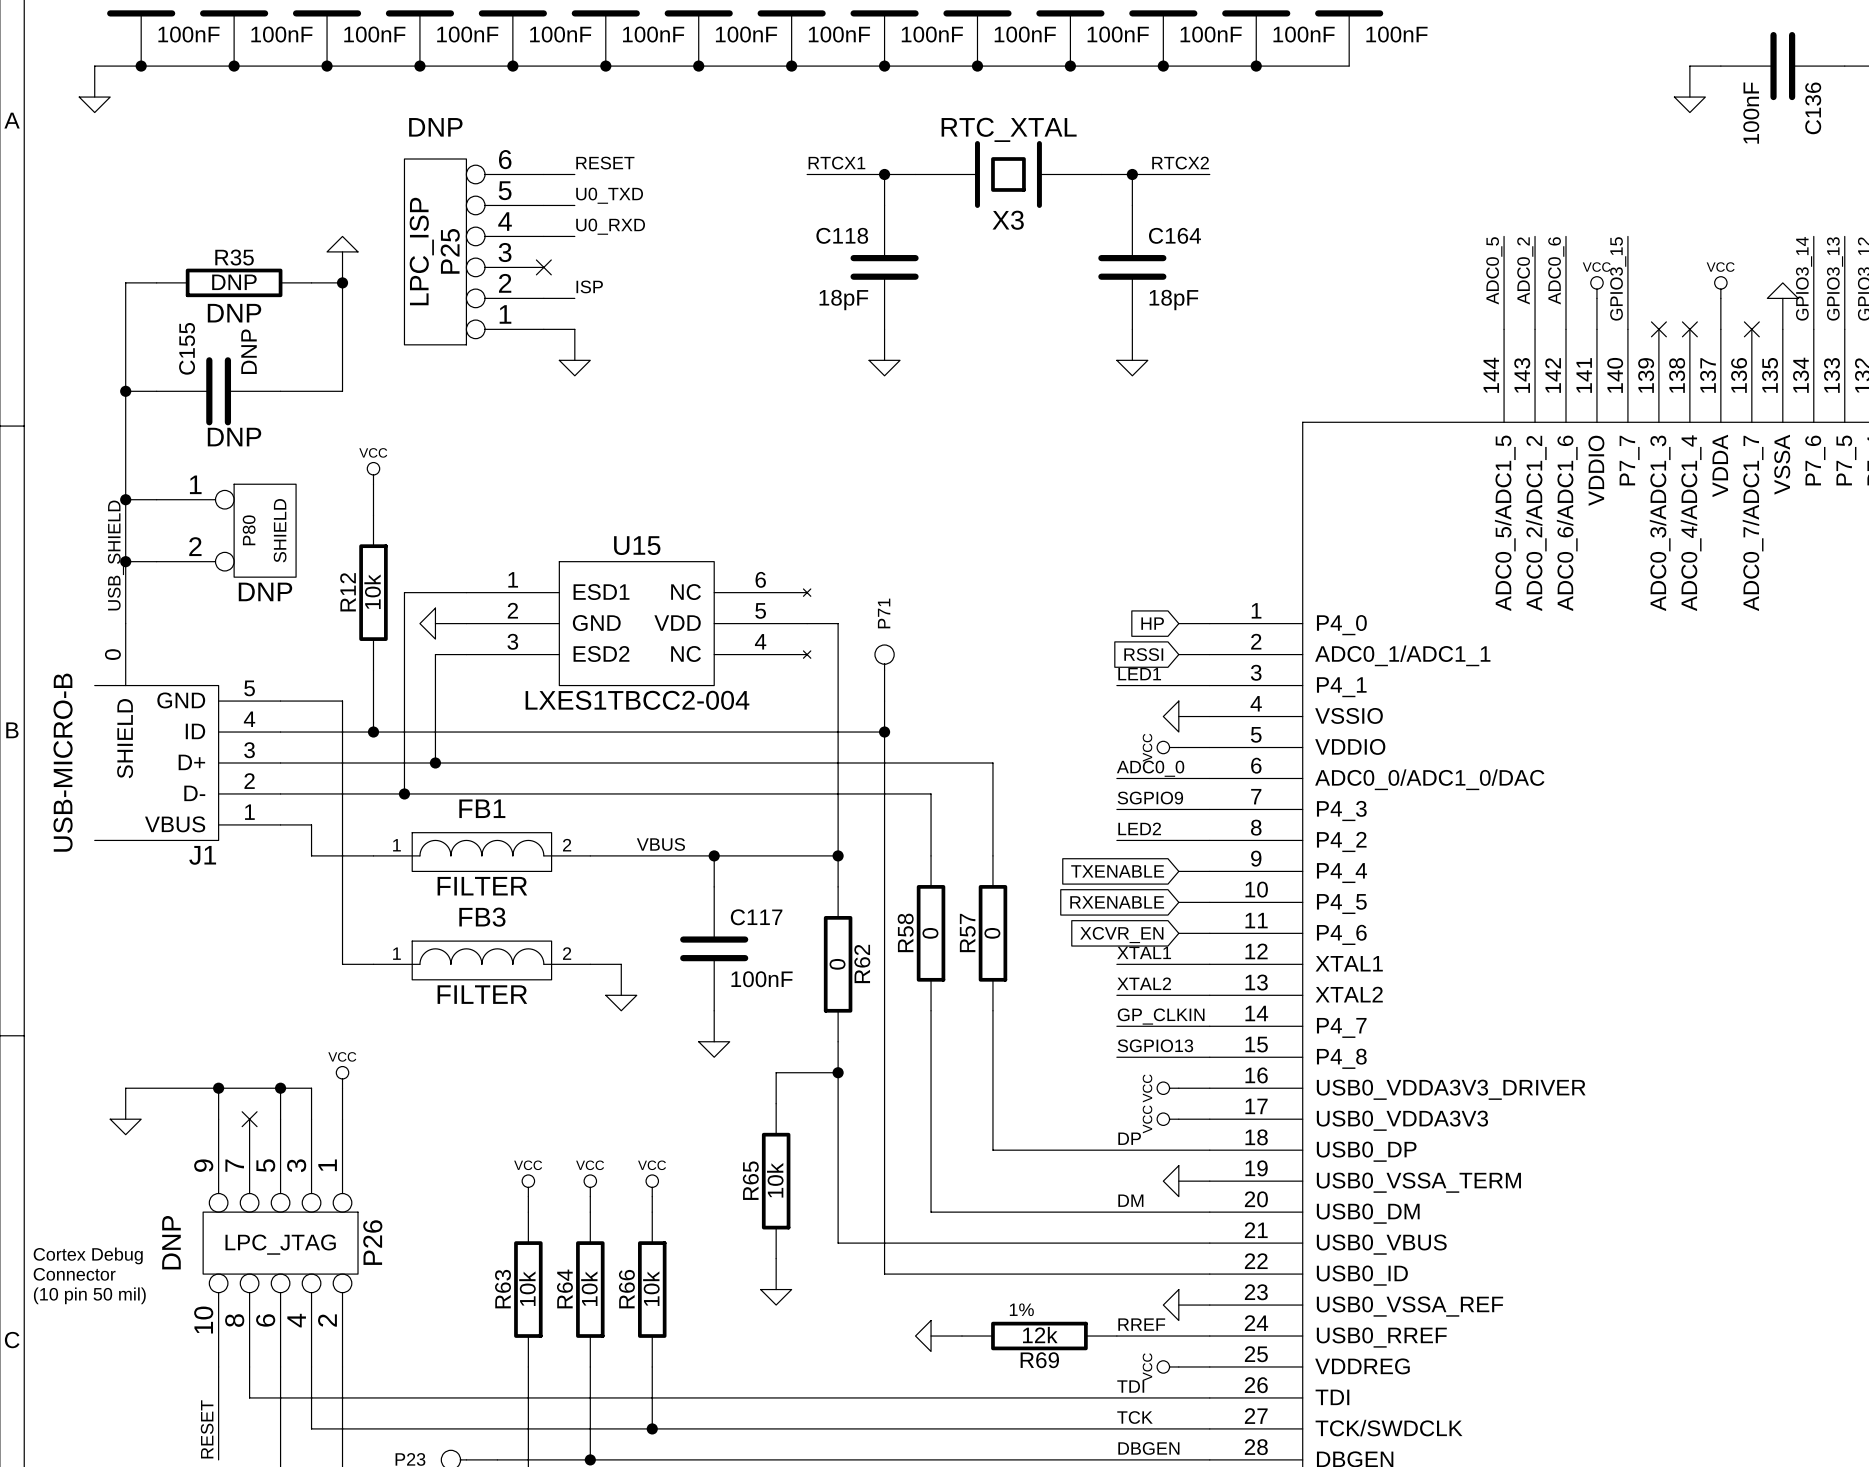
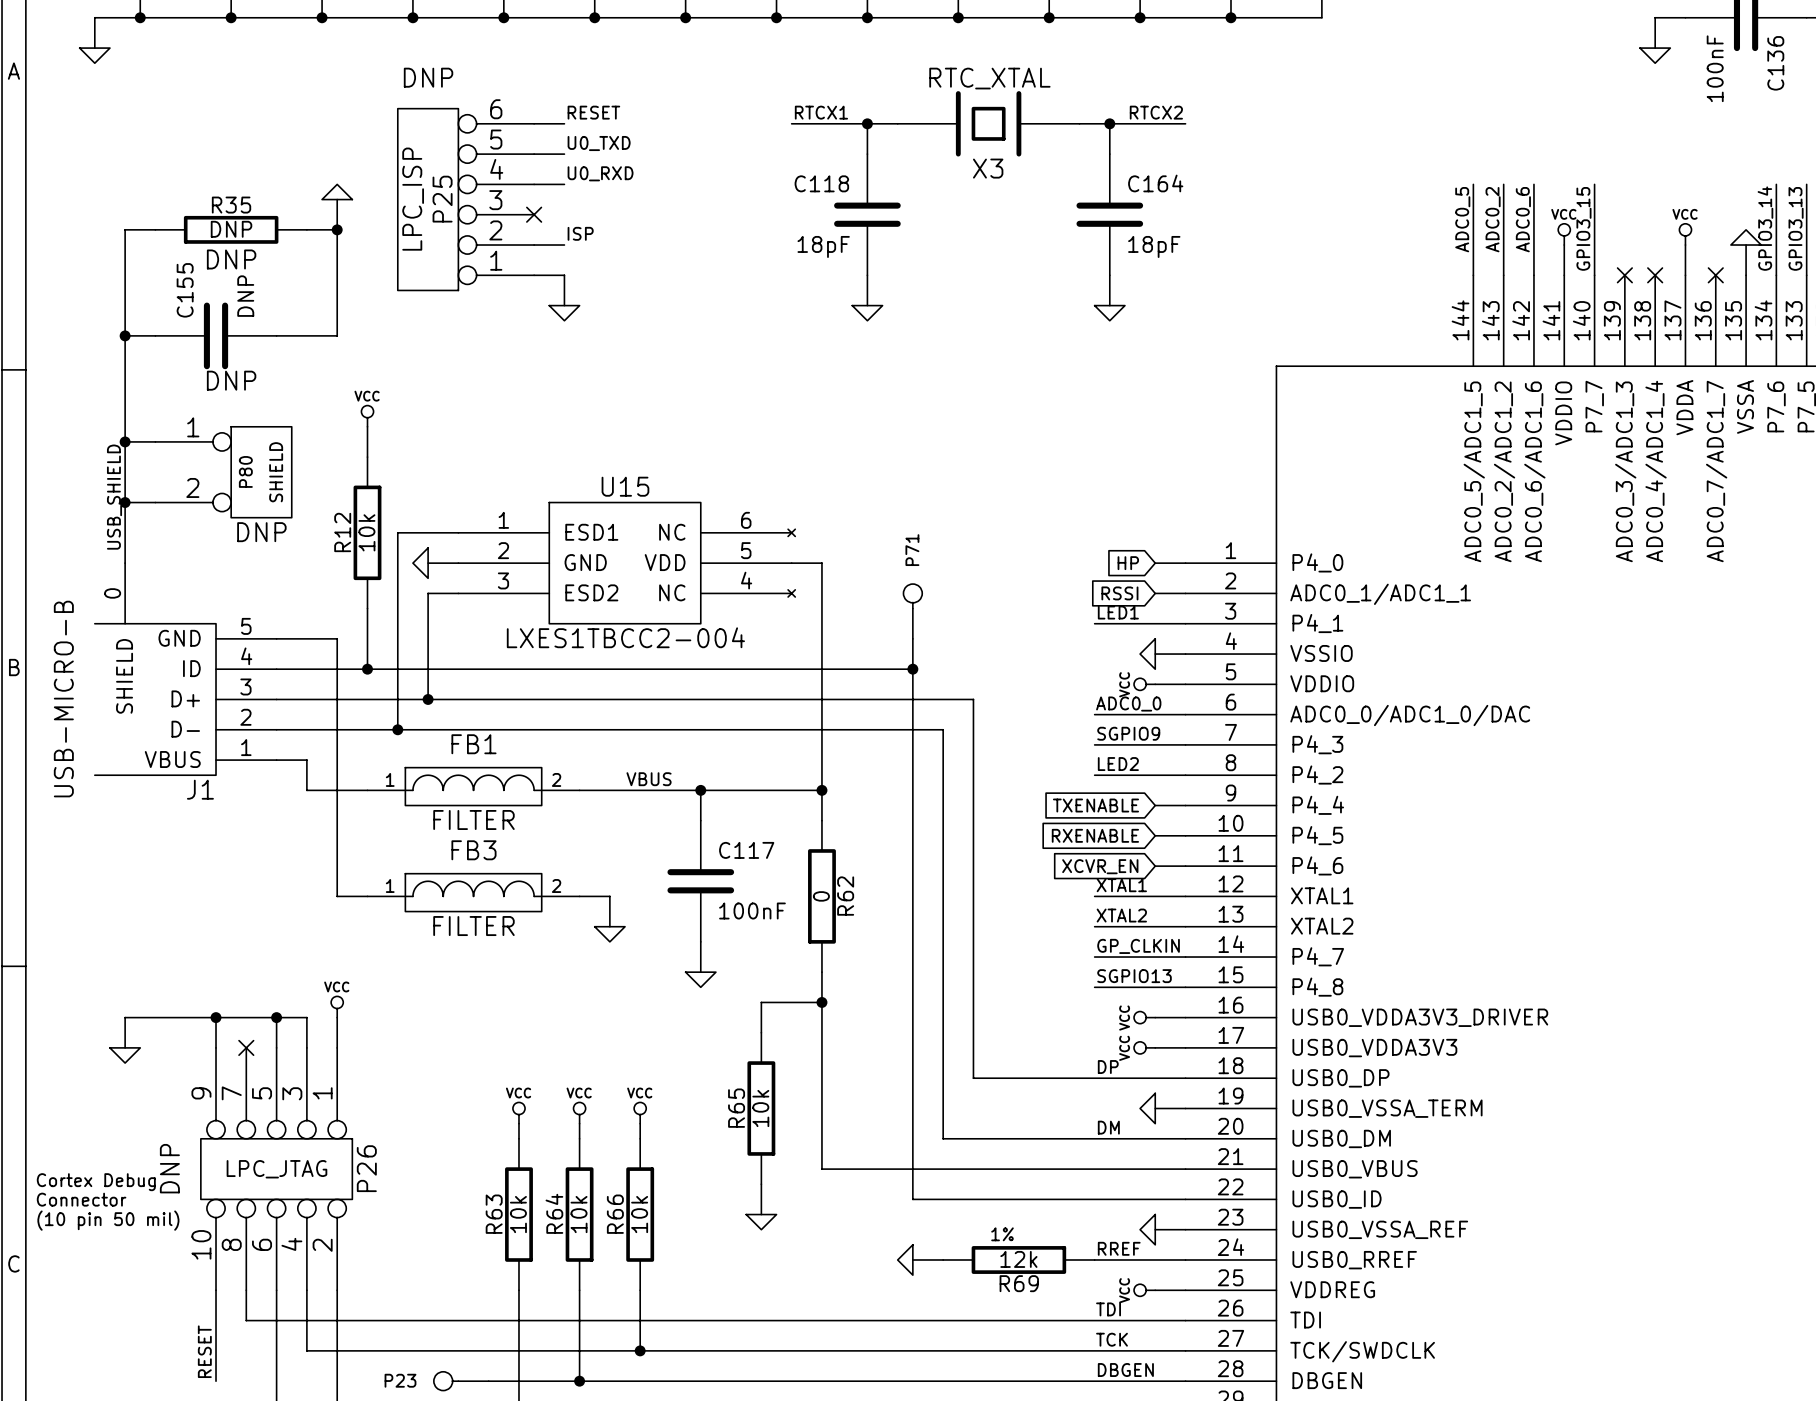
P71 position: (884, 673) -> (912, 611)
wire: (884, 701) (884, 1274) (931, 1274) -> none
wire: none -> (912, 638) (912, 729) (943, 729) (943, 1138)
wire: none -> (867, 669) (912, 669)
junction position: (884, 732) -> (912, 669)
wire: none -> (912, 790) (912, 941)
wire: none -> (973, 790) (973, 941)
R58: 0 (931, 933) -> none
R57: 0 (992, 933) -> none
wire: (931, 1212) (962, 1212) -> (912, 1138) (912, 1199)

